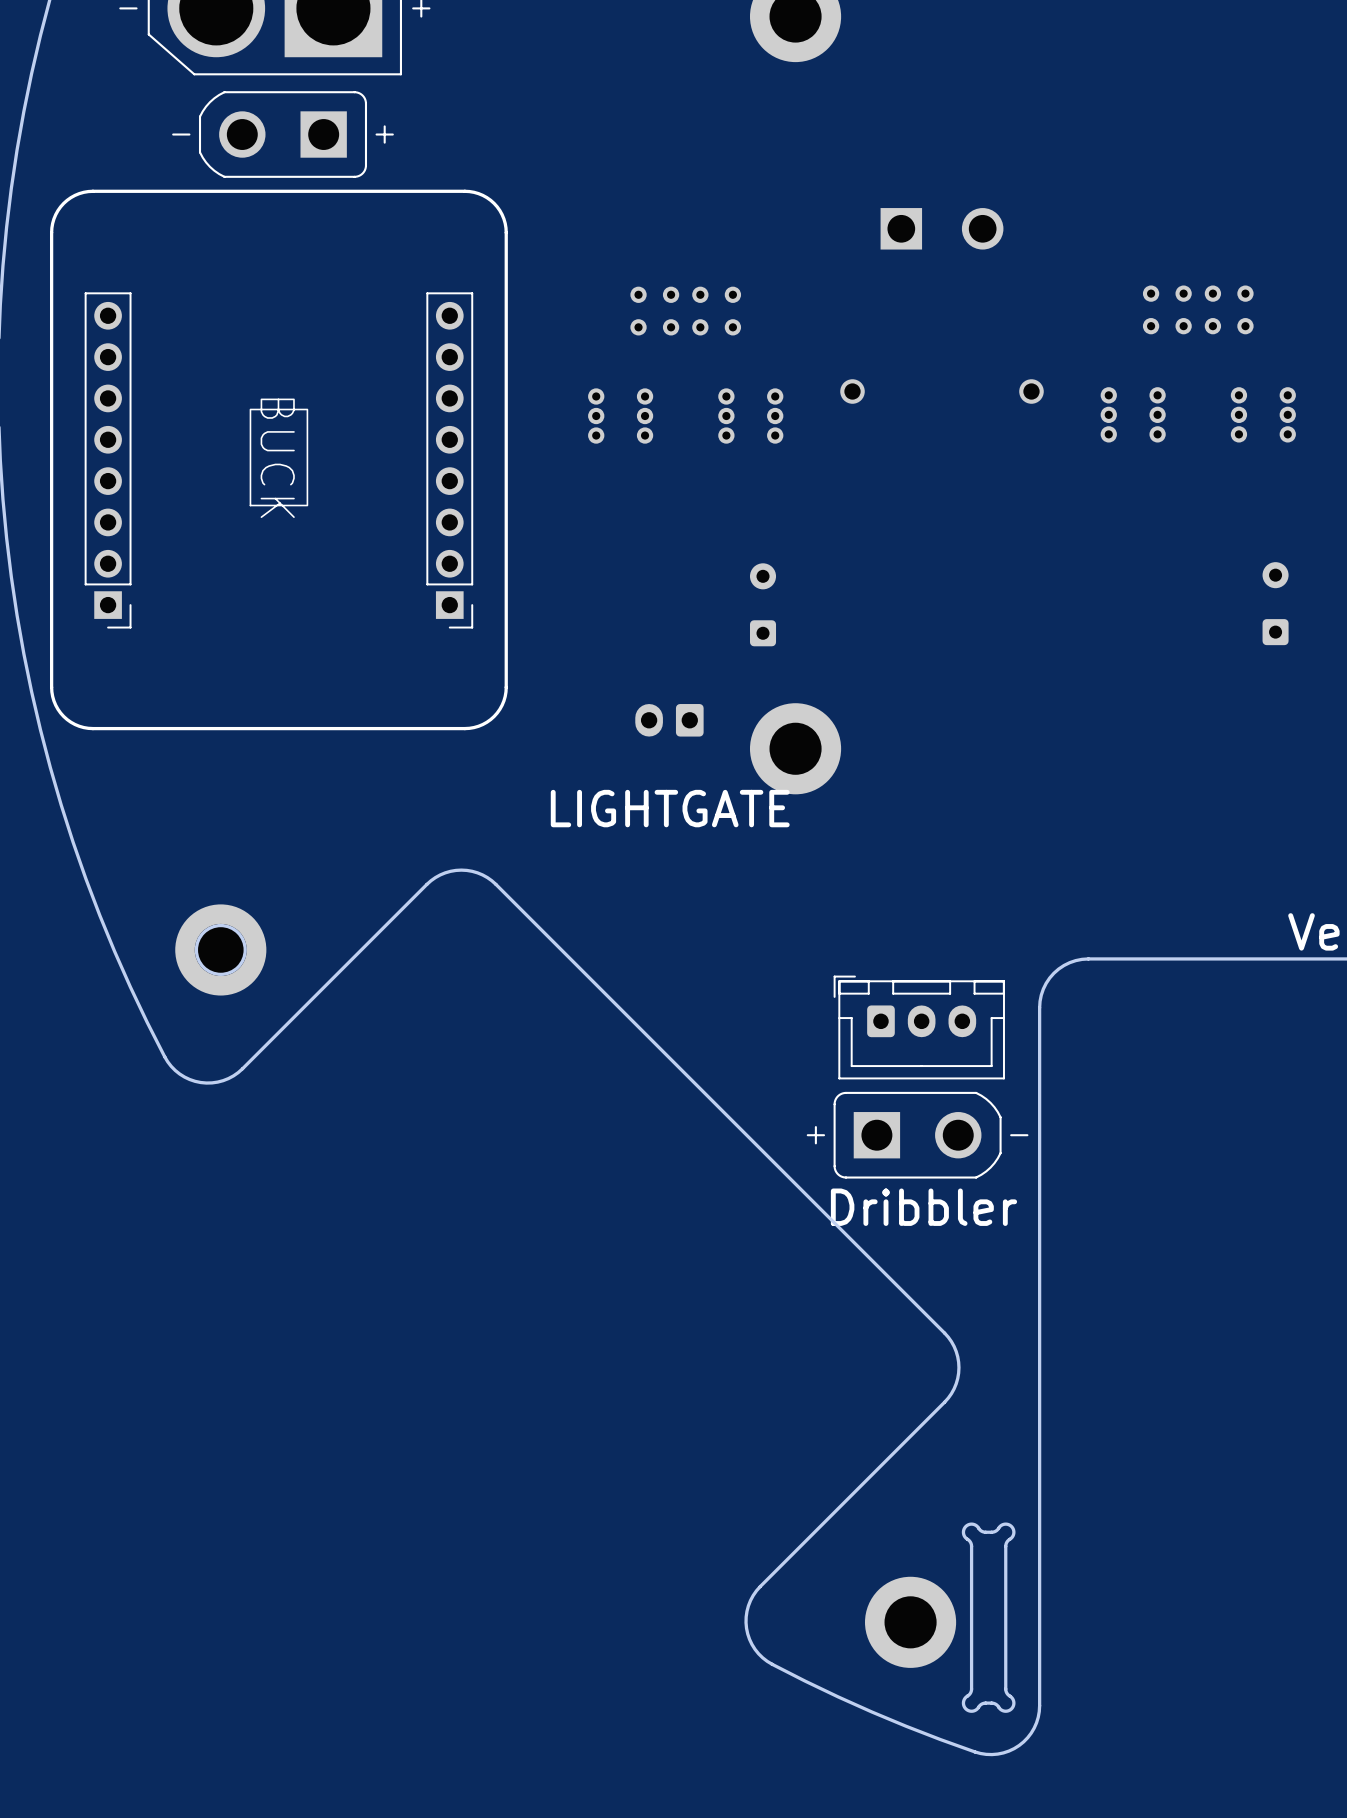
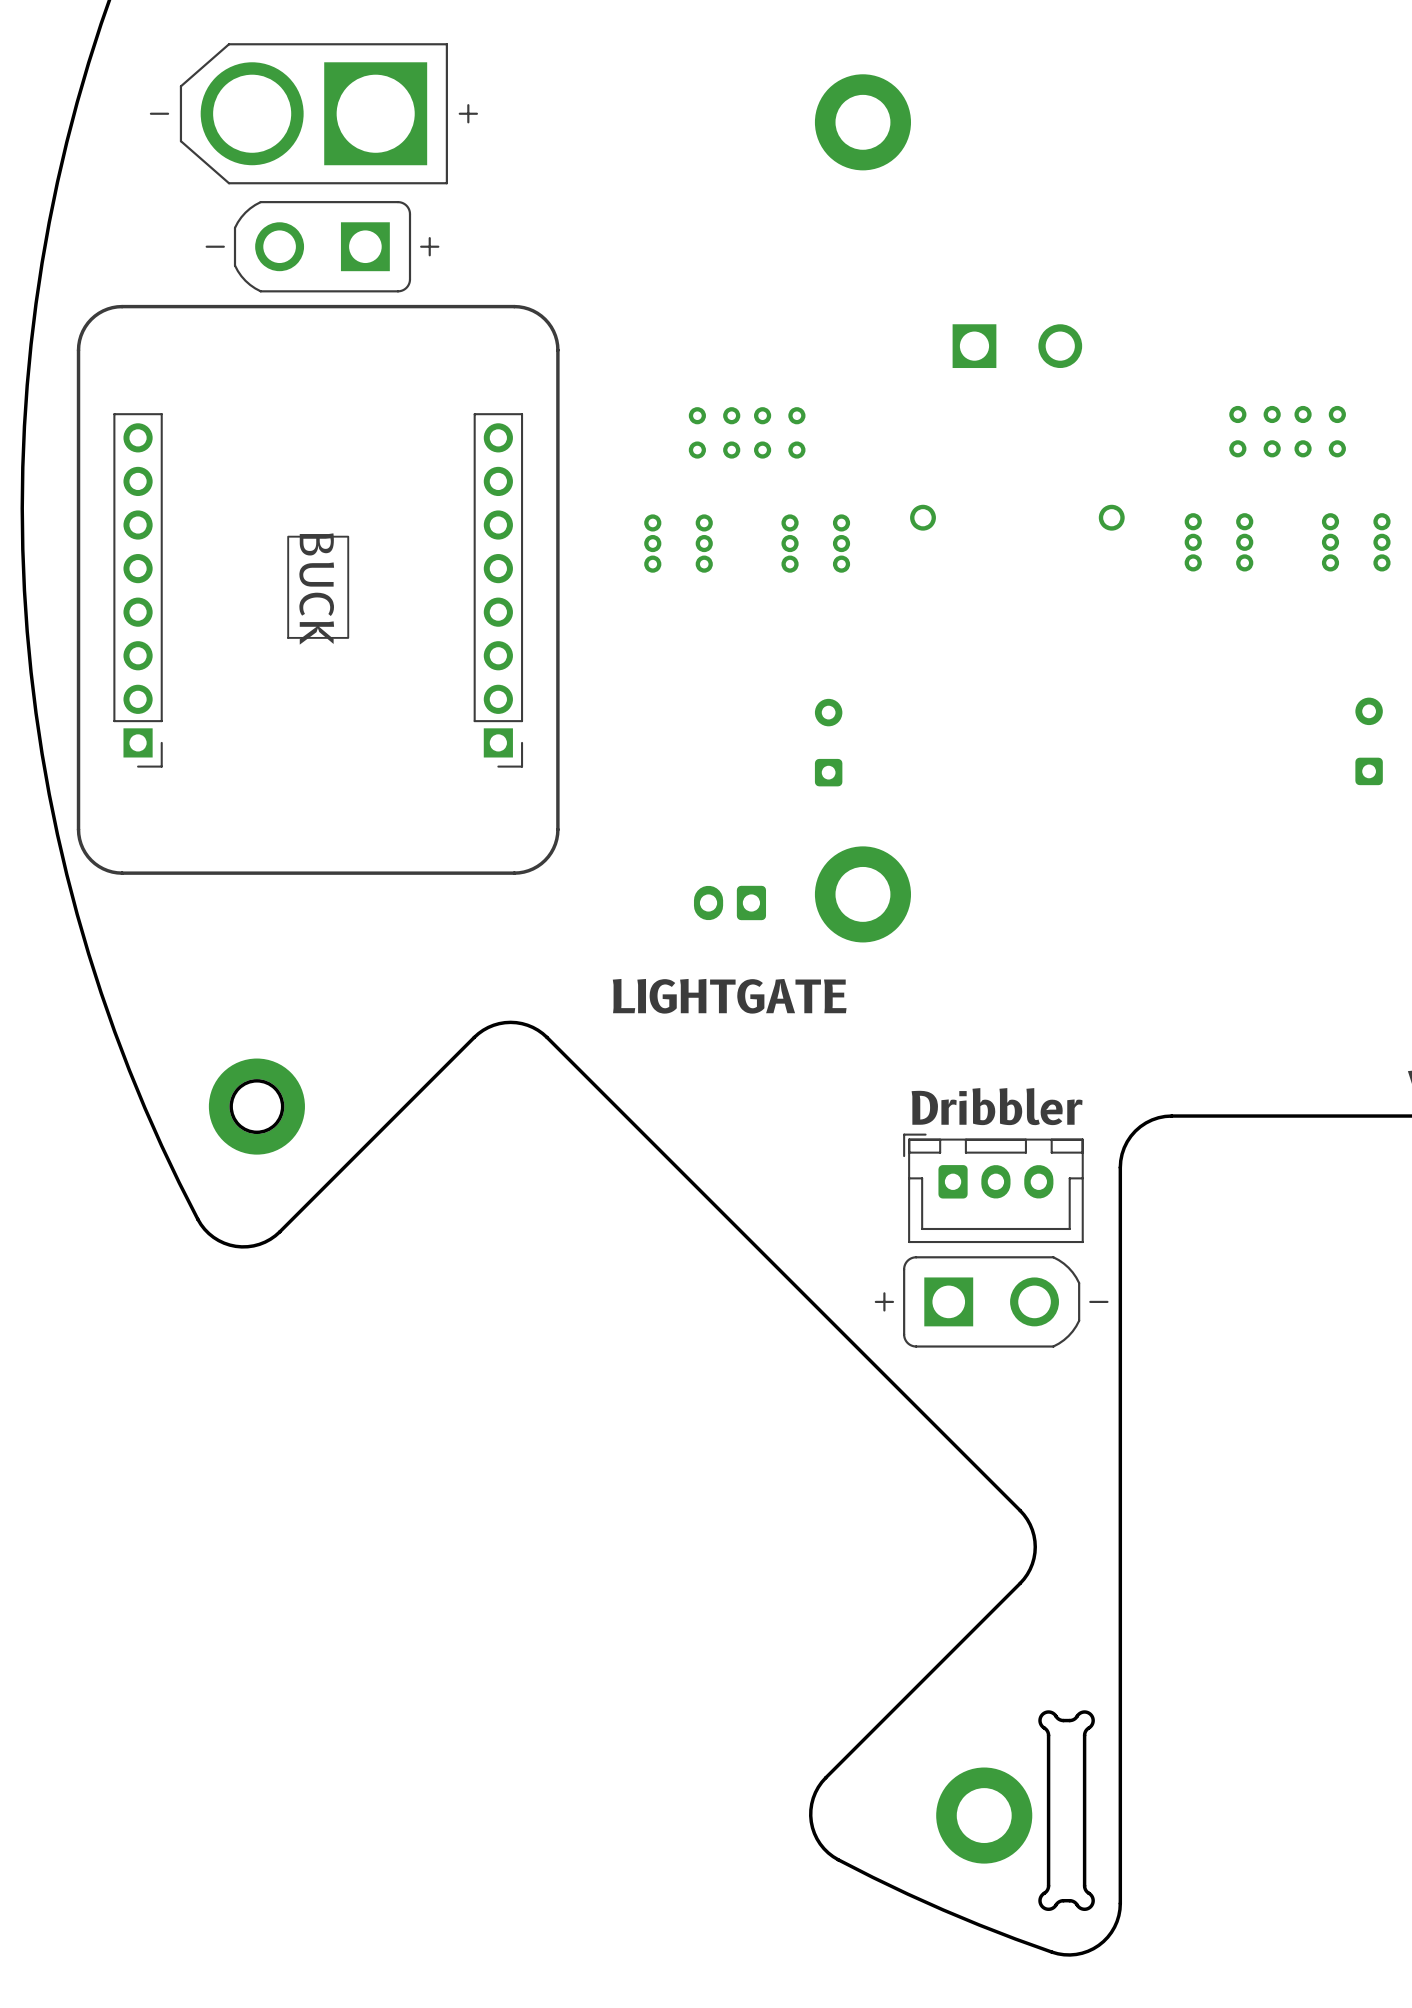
part position: (669, 720) -> (729, 902)
text position: LIGHTGATE (670, 808) -> LIGHTGATE (729, 996)
text position: Dribbler (923, 1207) -> Dribbler (997, 1106)

